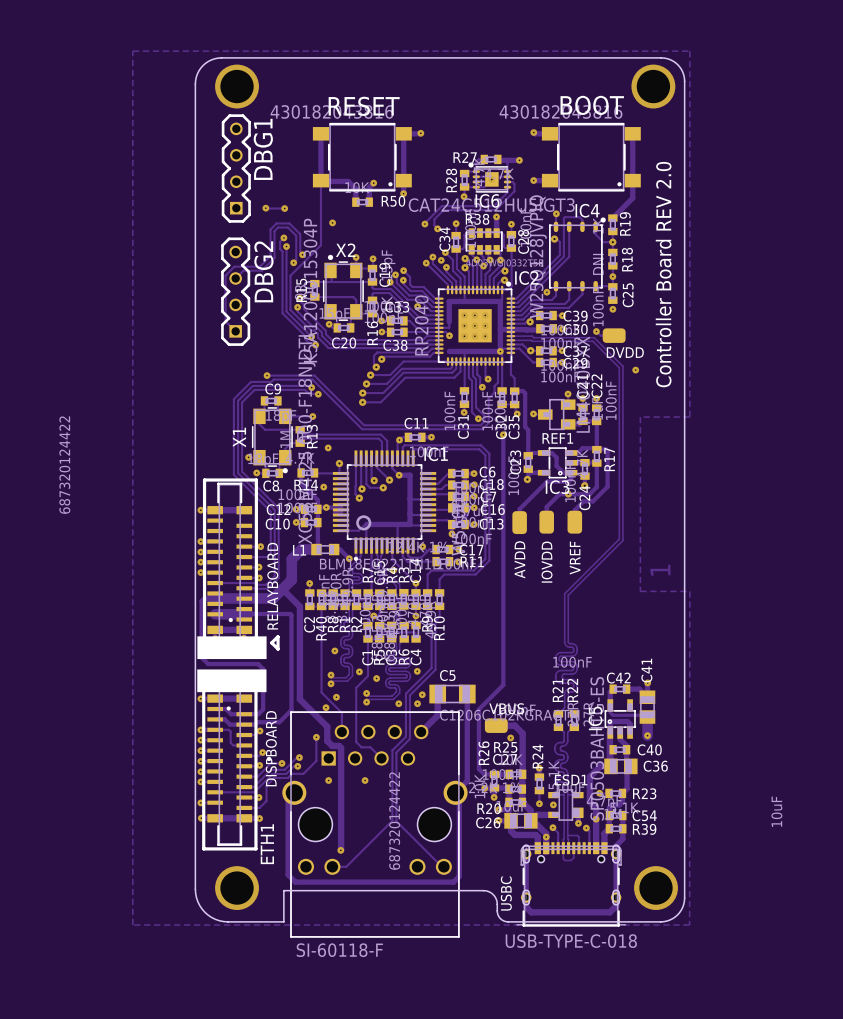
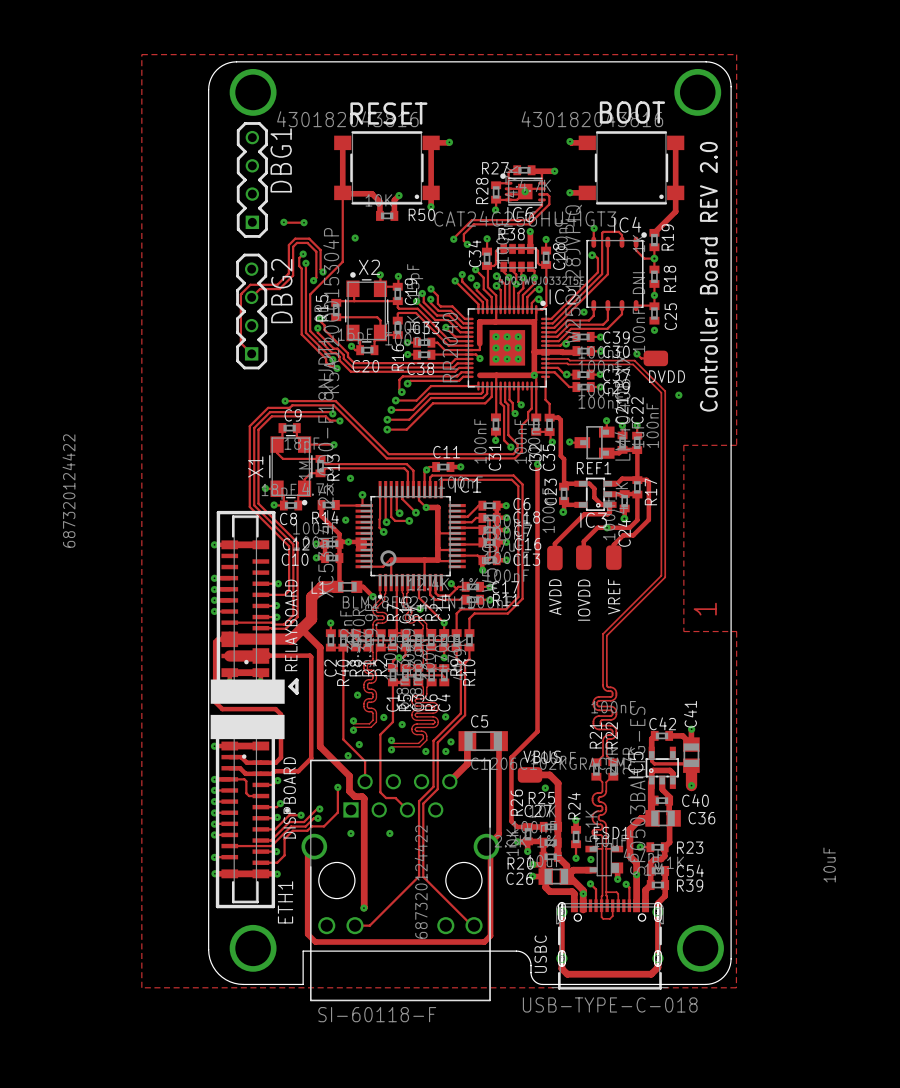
IC6 value: CAT24C512HU5IGT3 (491, 205) -> CAT24C256HU4IGT3 (525, 218)

